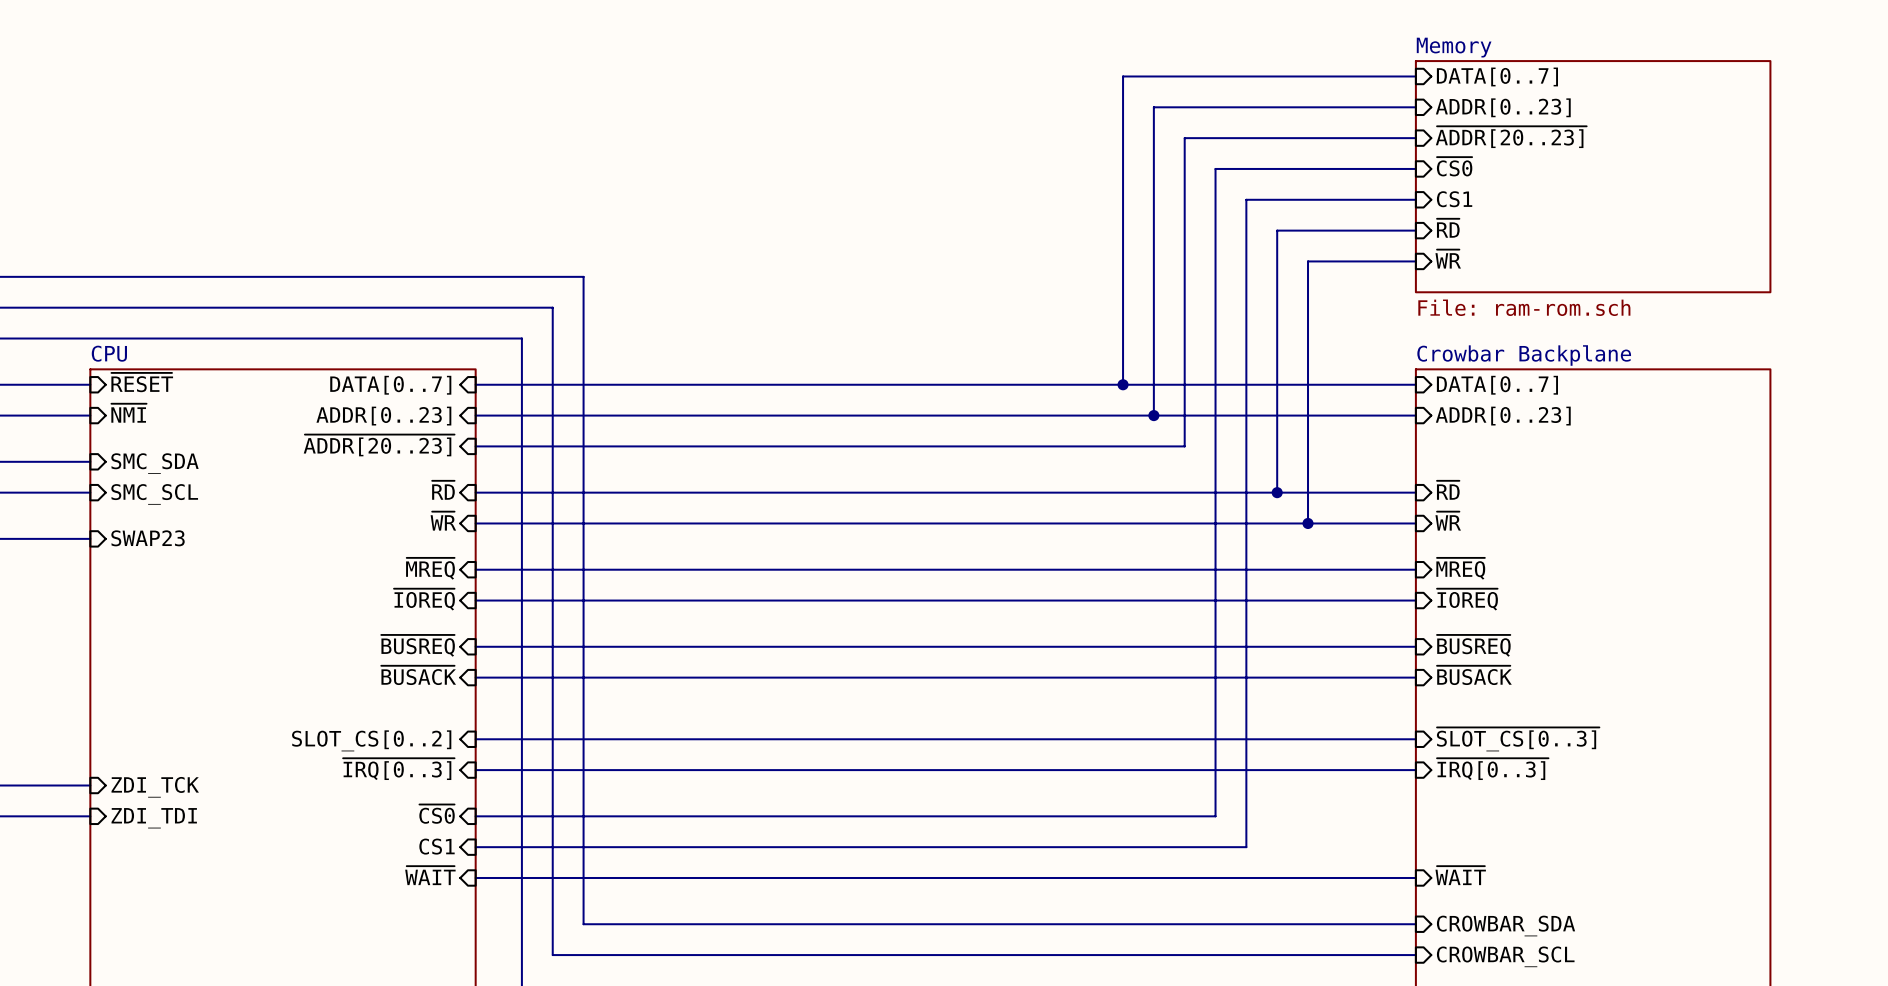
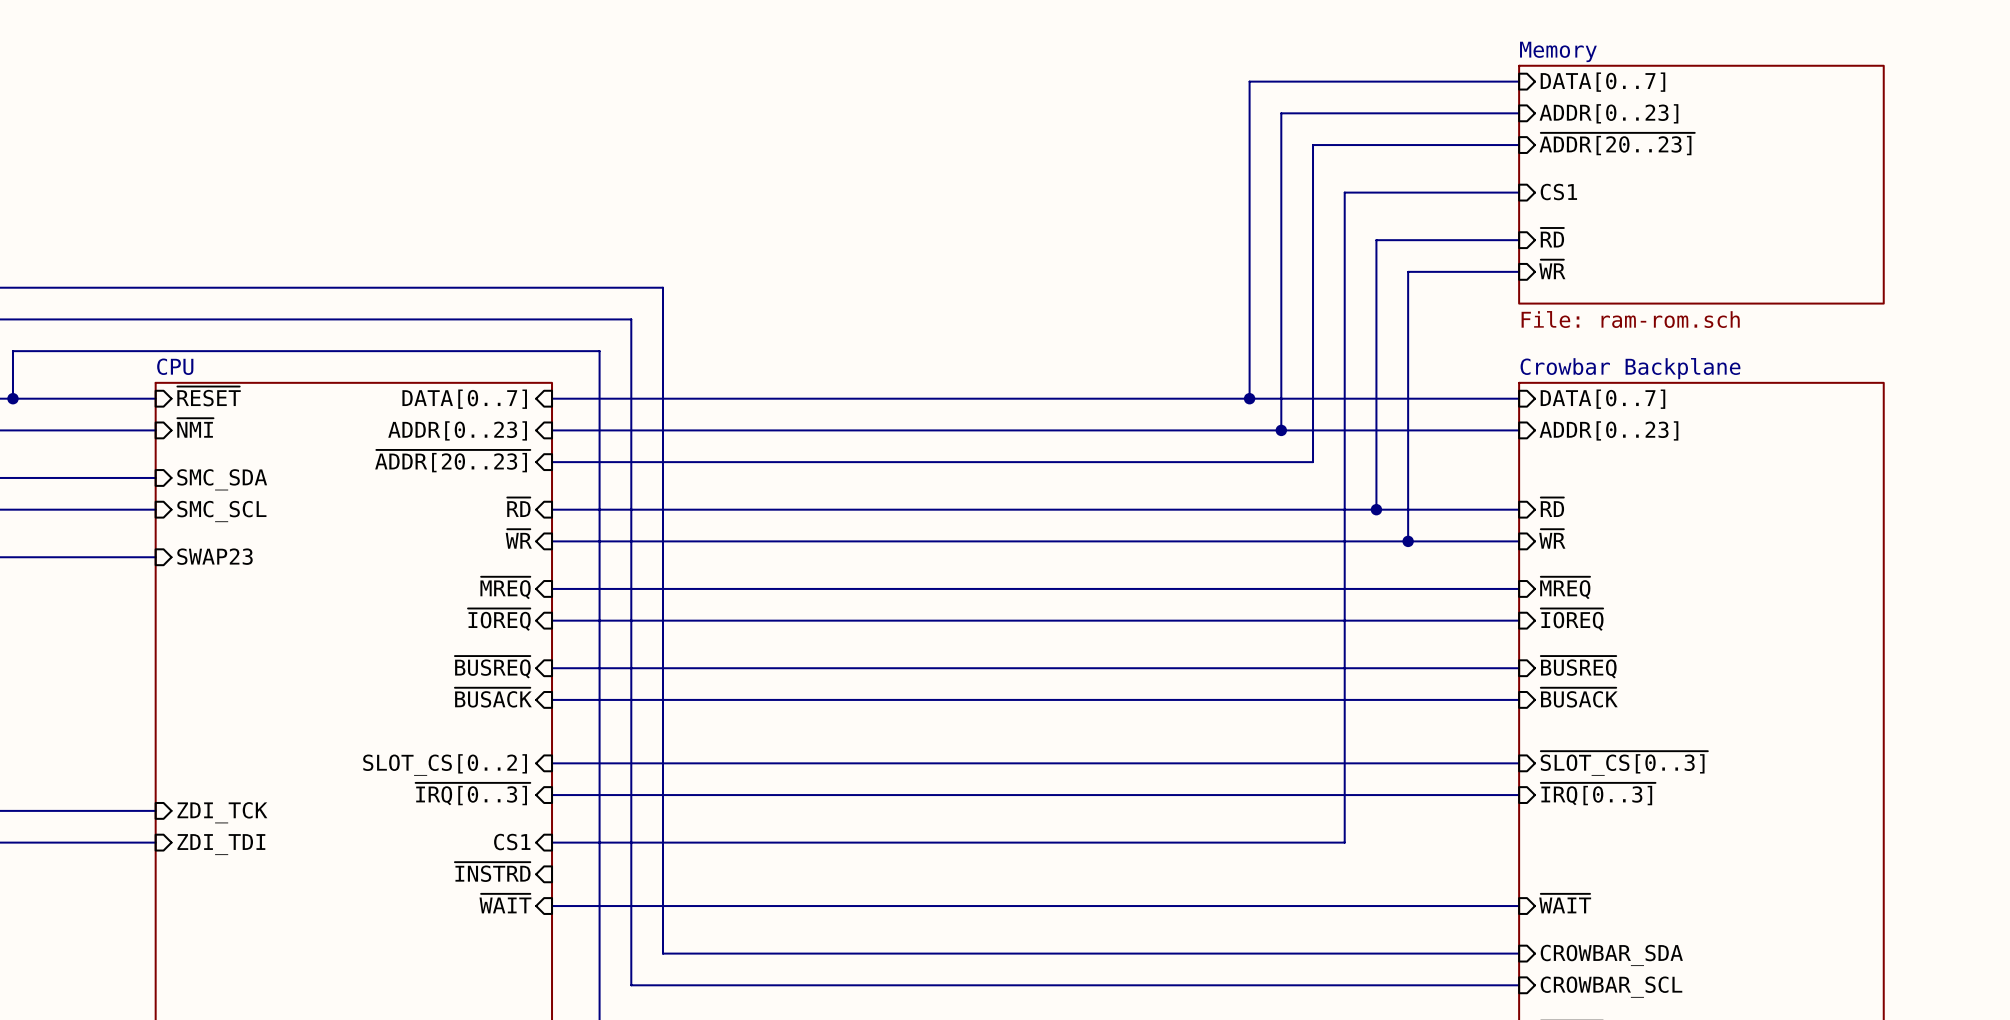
bus: (1153, 76) (1123, 76) (1123, 384) -> none
bus: (1153, 107) (1184, 107) -> (1249, 113) (1249, 81)
bus: (1184, 138) (1215, 138) -> (1281, 145) (1281, 113)
sheet pin: ~{CS0} (1454, 166) -> none
wire: (1415, 168) (1215, 168) (1215, 816) -> (1344, 842) (1313, 842)
wire: (1246, 199) (1415, 199) -> (1344, 208) (1344, 192) (1519, 192)
sheet pin position: CS1 (1454, 199) -> CS1 (1558, 192)
junction: (1123, 384) -> none
bus: (1153, 384) (1153, 415) -> none
junction: none -> (1249, 398)
junction: (1153, 415) -> none
bus: (1184, 415) (1184, 446) -> (1313, 145) (1313, 462) (1281, 462)
junction: none -> (1281, 430)
sheet pin: ~{CS0} (437, 814) -> CS1 (512, 842)
wire: (1246, 816) (1246, 847) (475, 847) -> none
sheet pin: CS1 (437, 846) -> ~{INSTRD} (492, 872)

